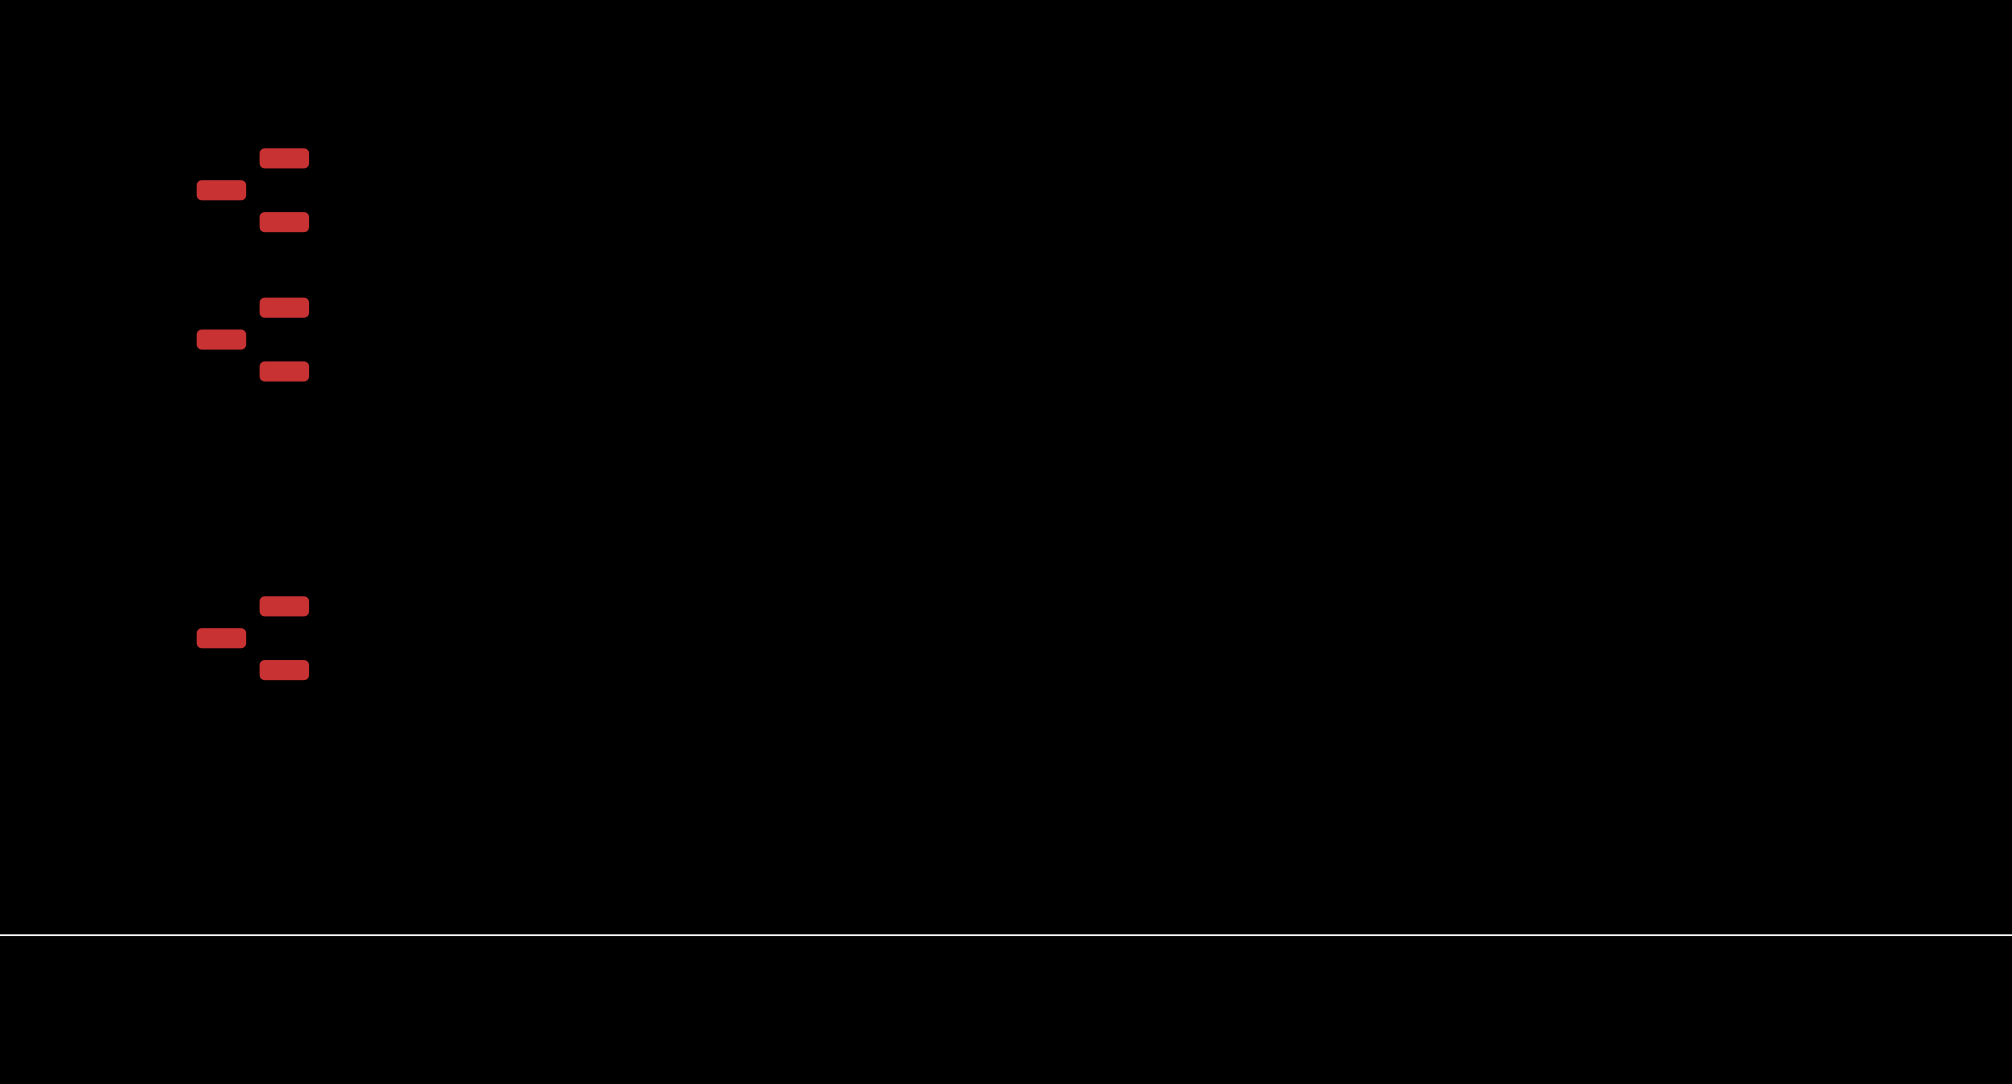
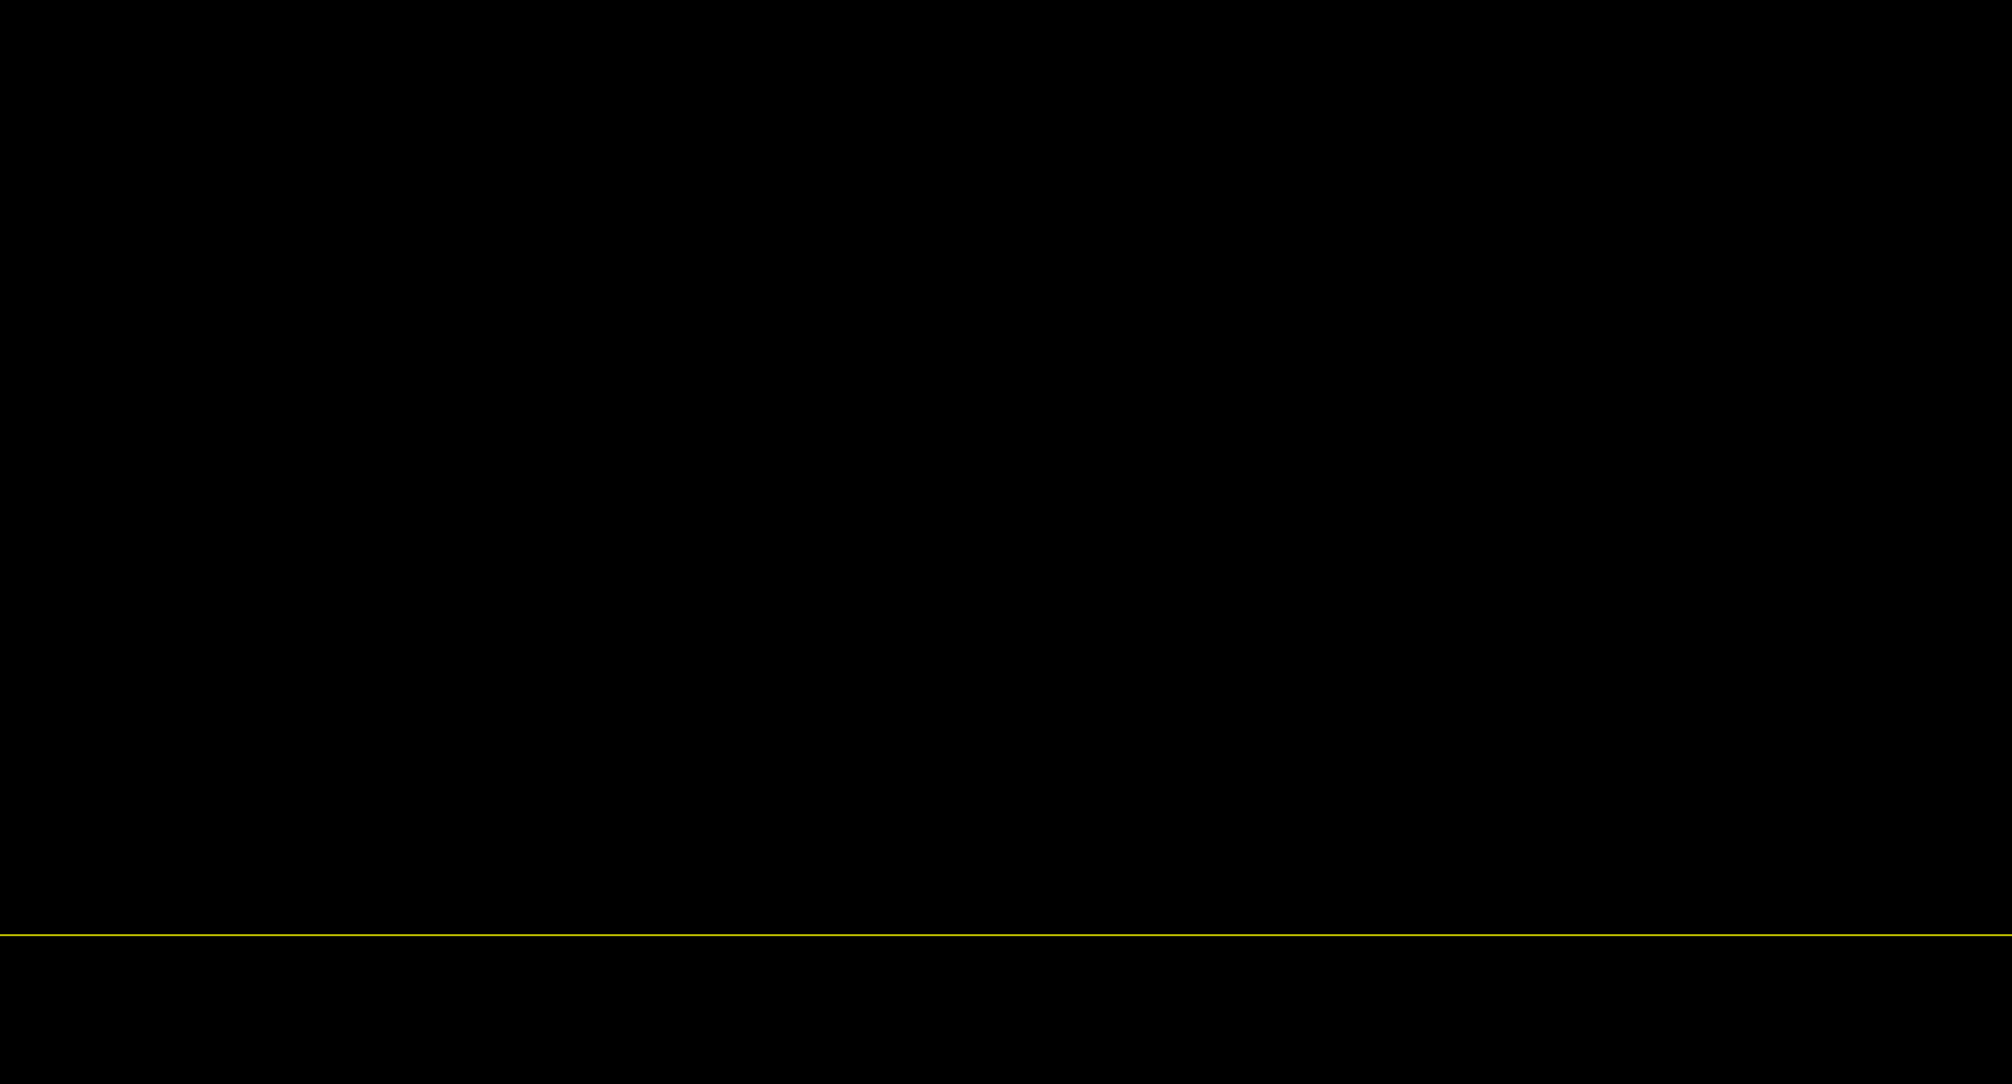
part: (252, 190) -> none
part: (252, 339) -> none
part: (252, 638) -> none

